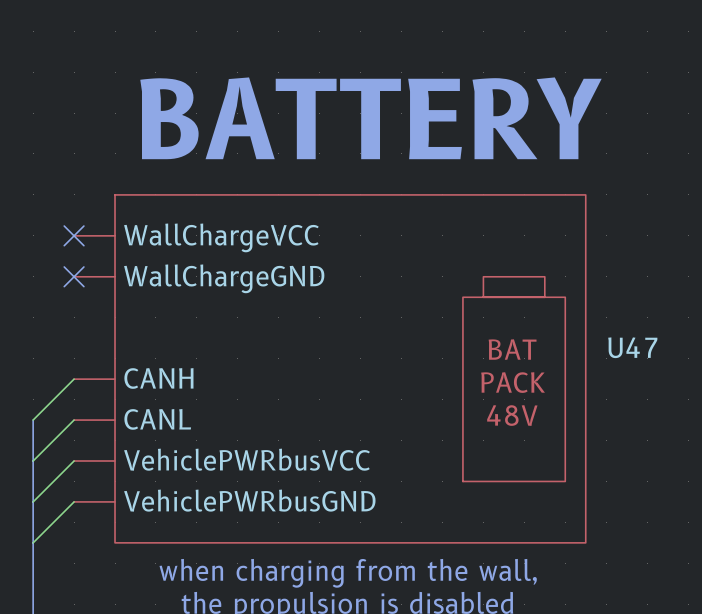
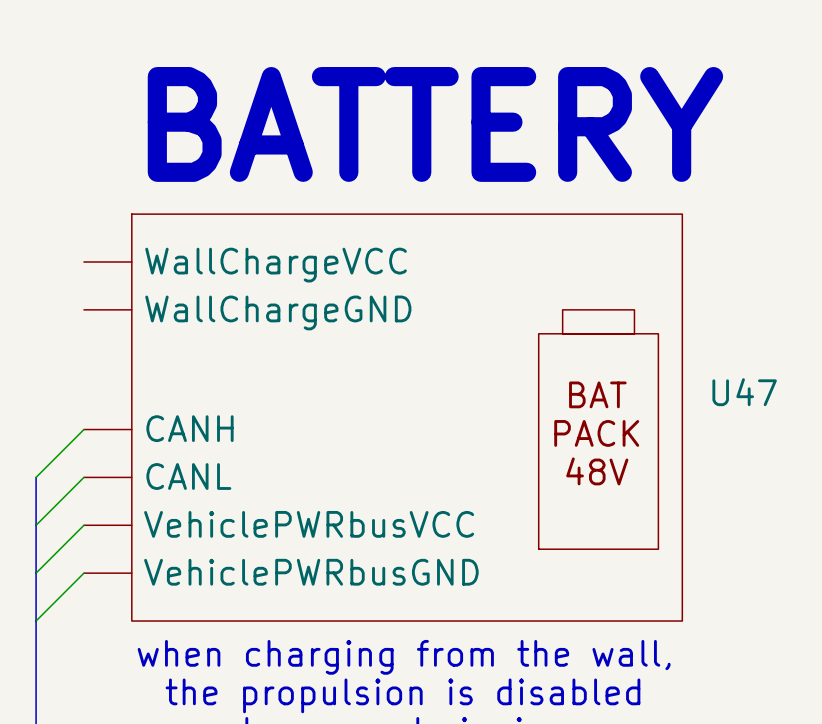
no-connect mark: (74, 235) -> none
no-connect mark: (74, 276) -> none

